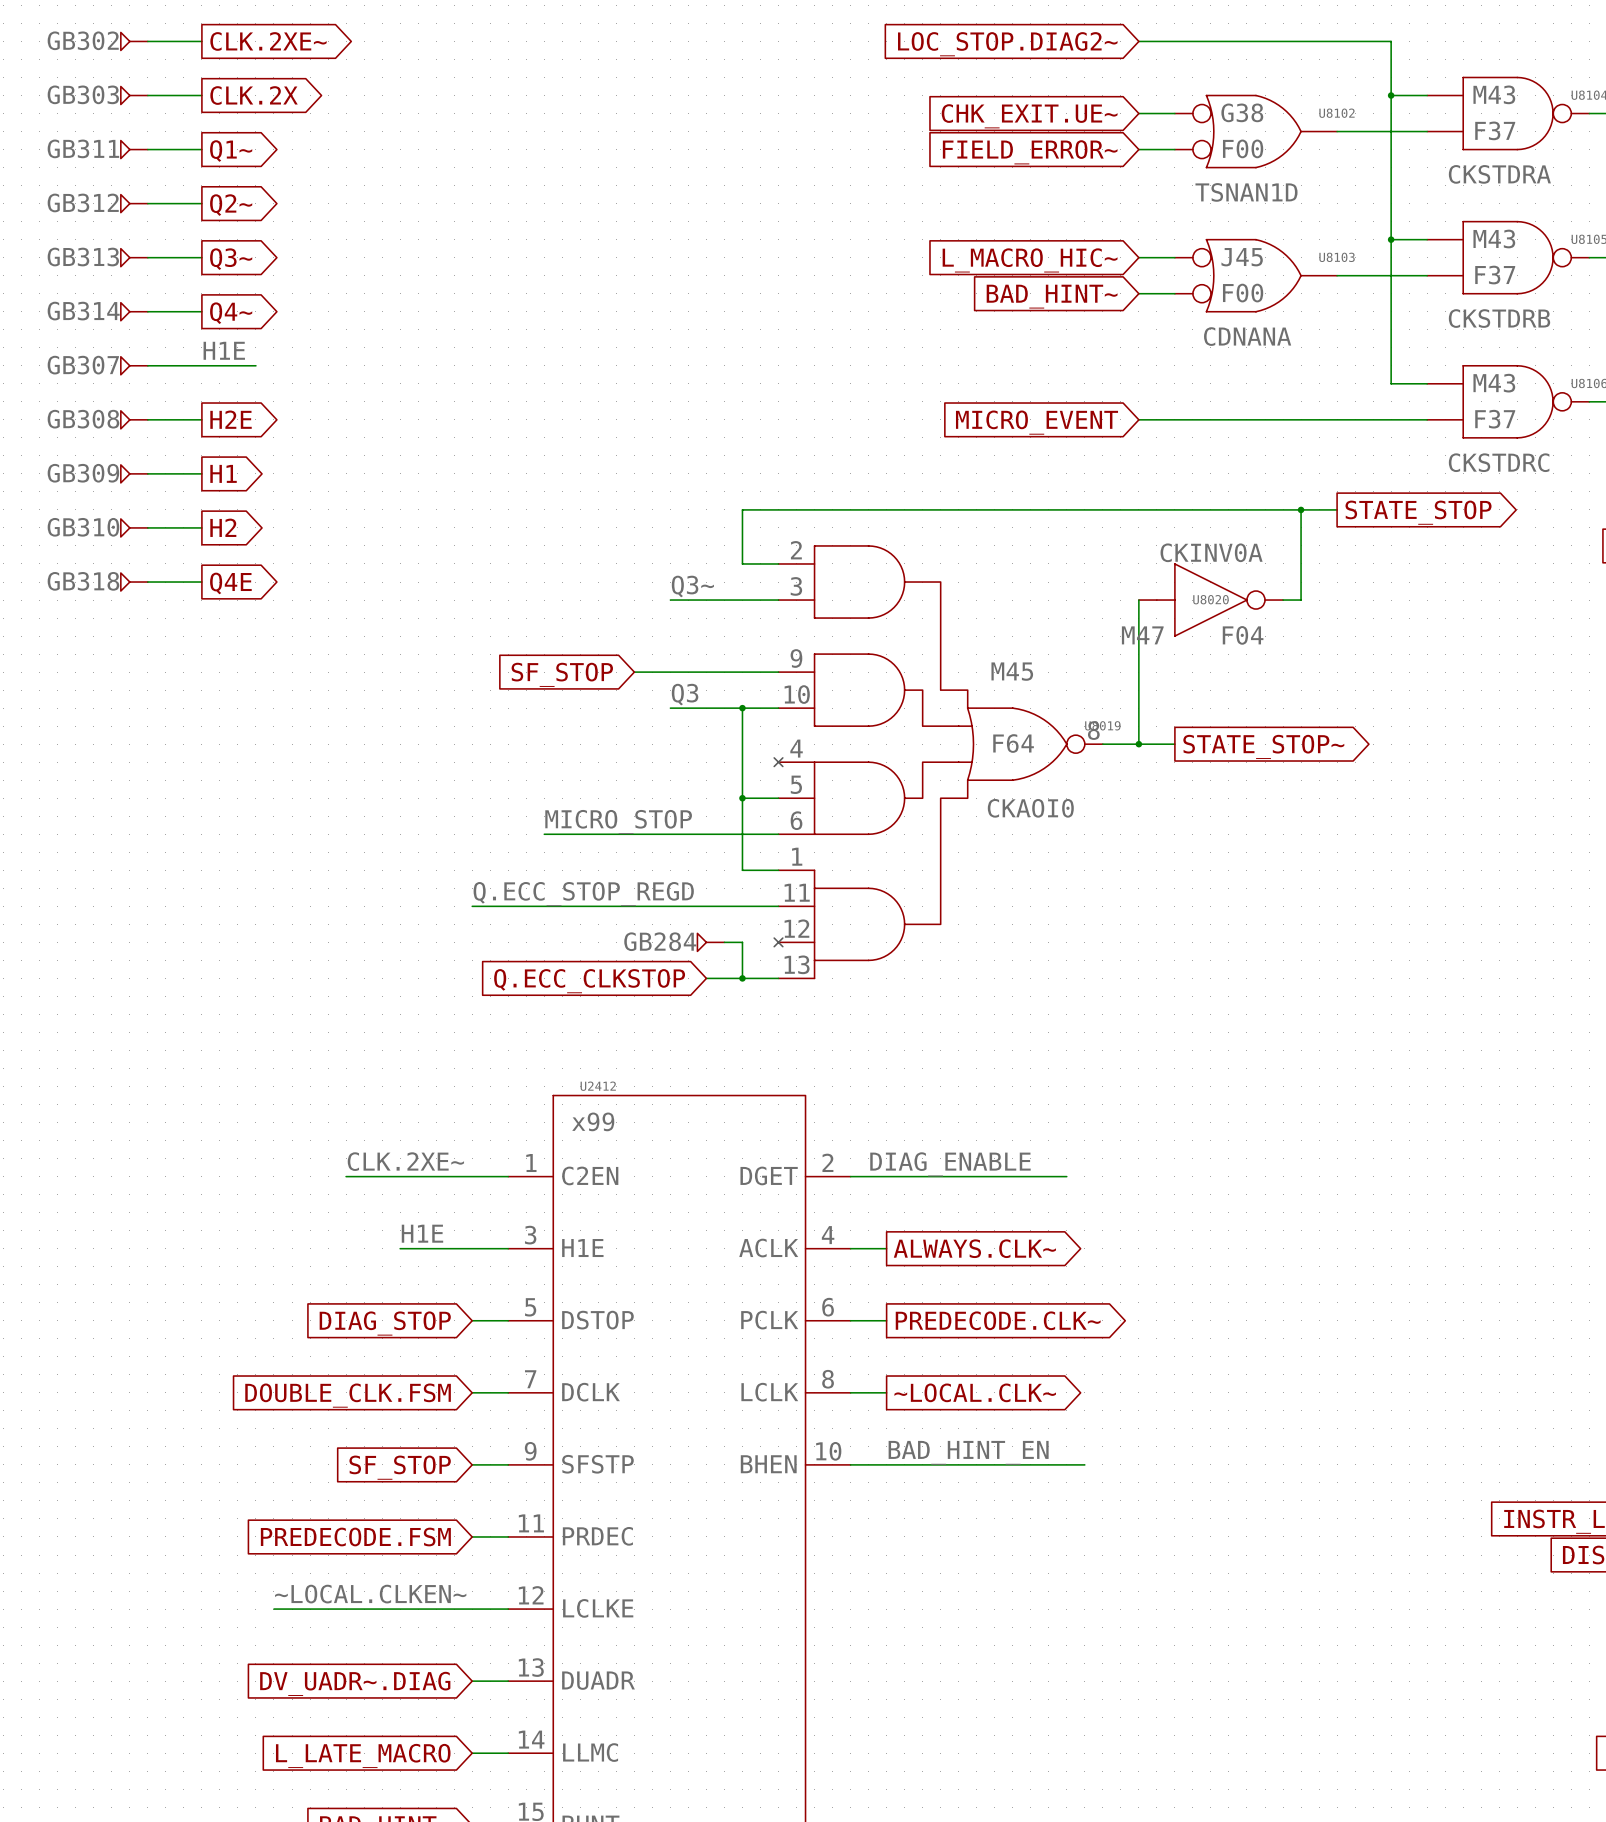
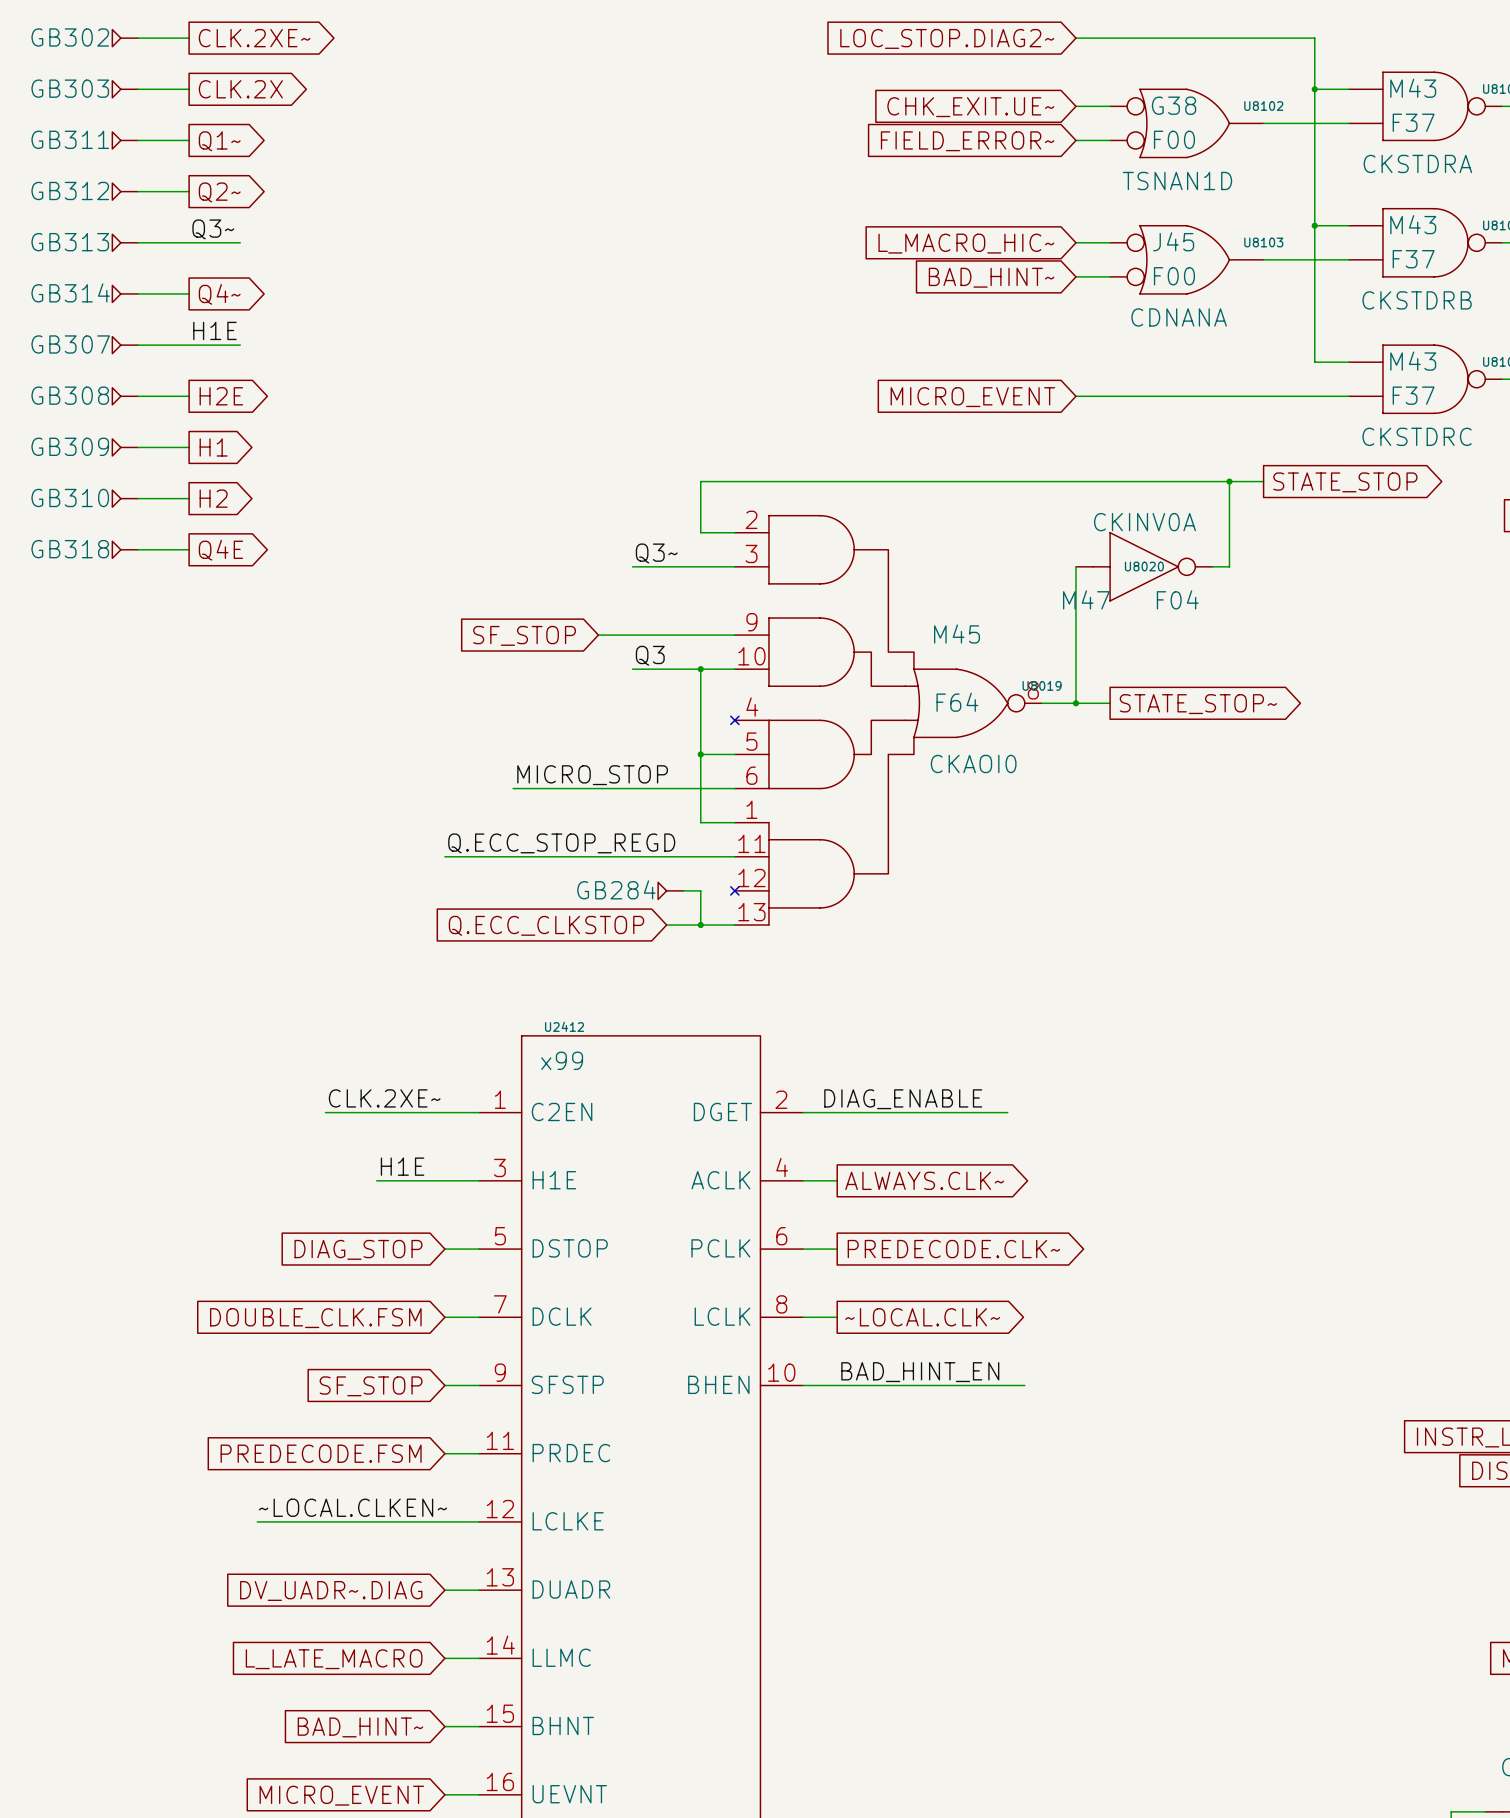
label: none -> Q3~ (213, 229)
wire: none -> (189, 242) (240, 242)
global label: Q3~ (231, 259) -> none

